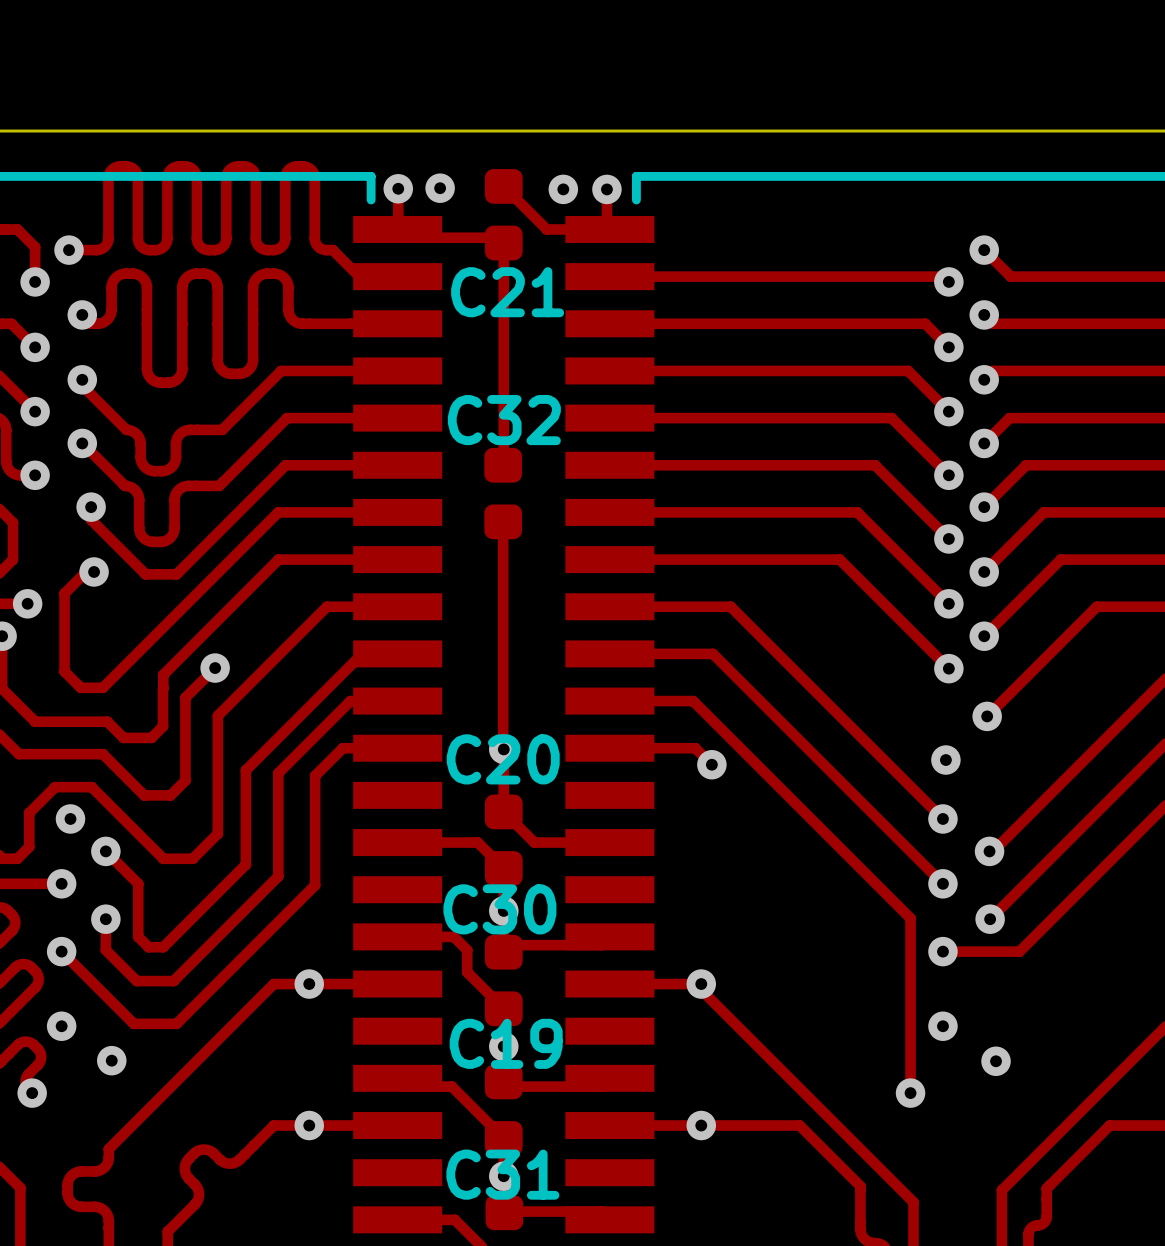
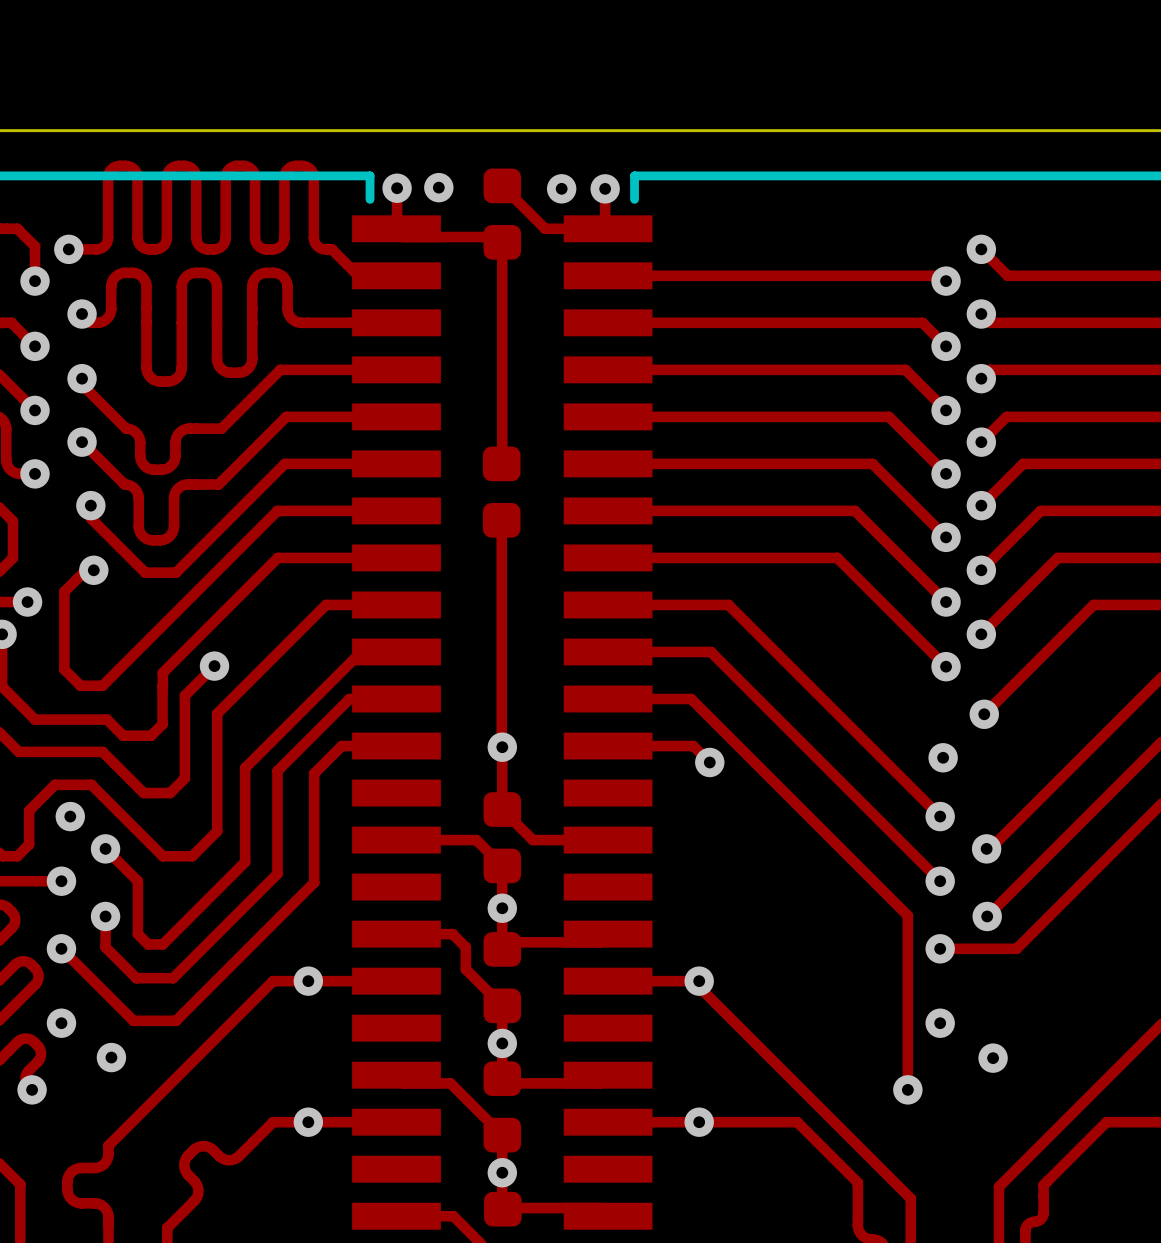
C21 name: C21 (507, 292) -> none
C32 name: C32 (504, 420) -> none
C20 name: C20 (503, 759) -> none
C30 name: C30 (499, 909) -> none
C19 name: C19 (506, 1043) -> none
C31 name: C31 (502, 1174) -> none

